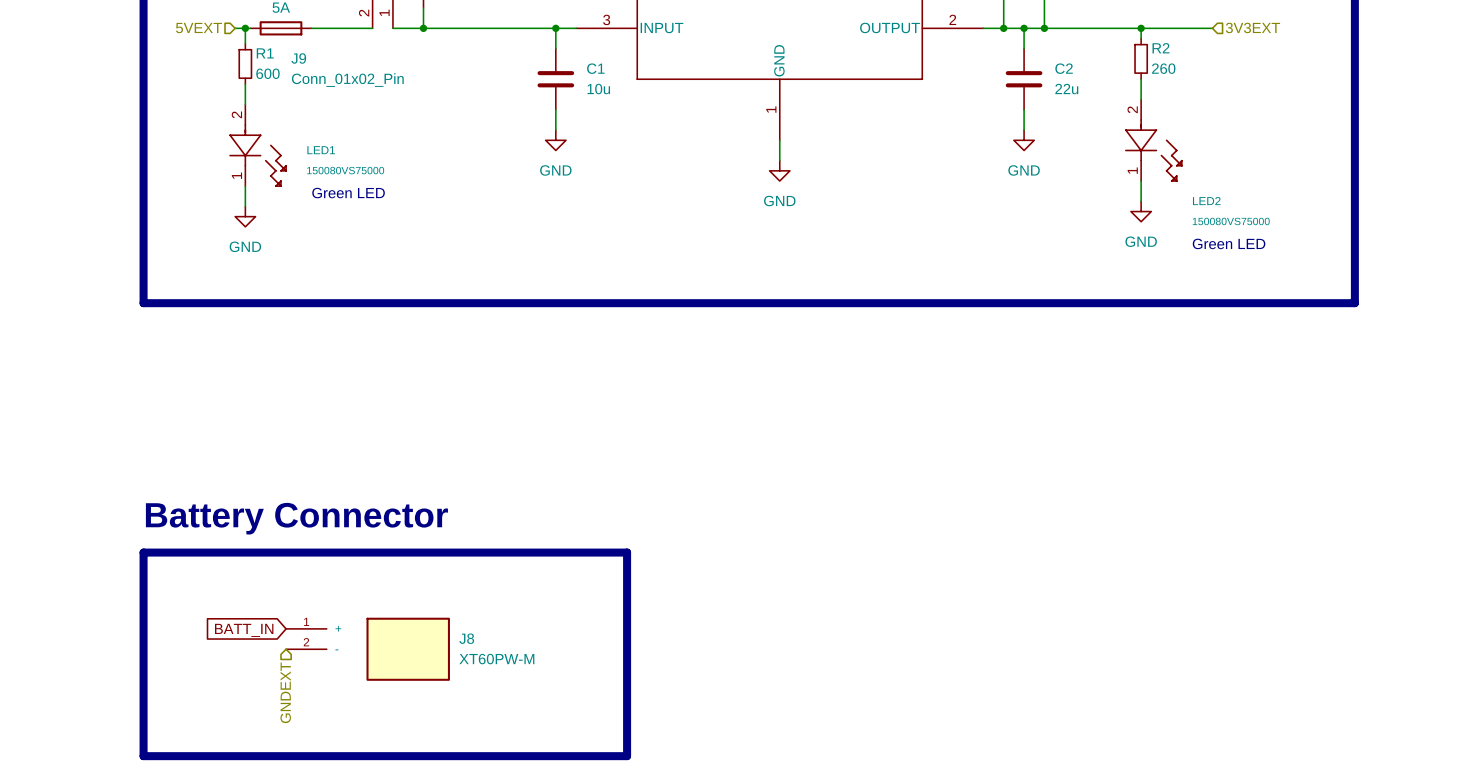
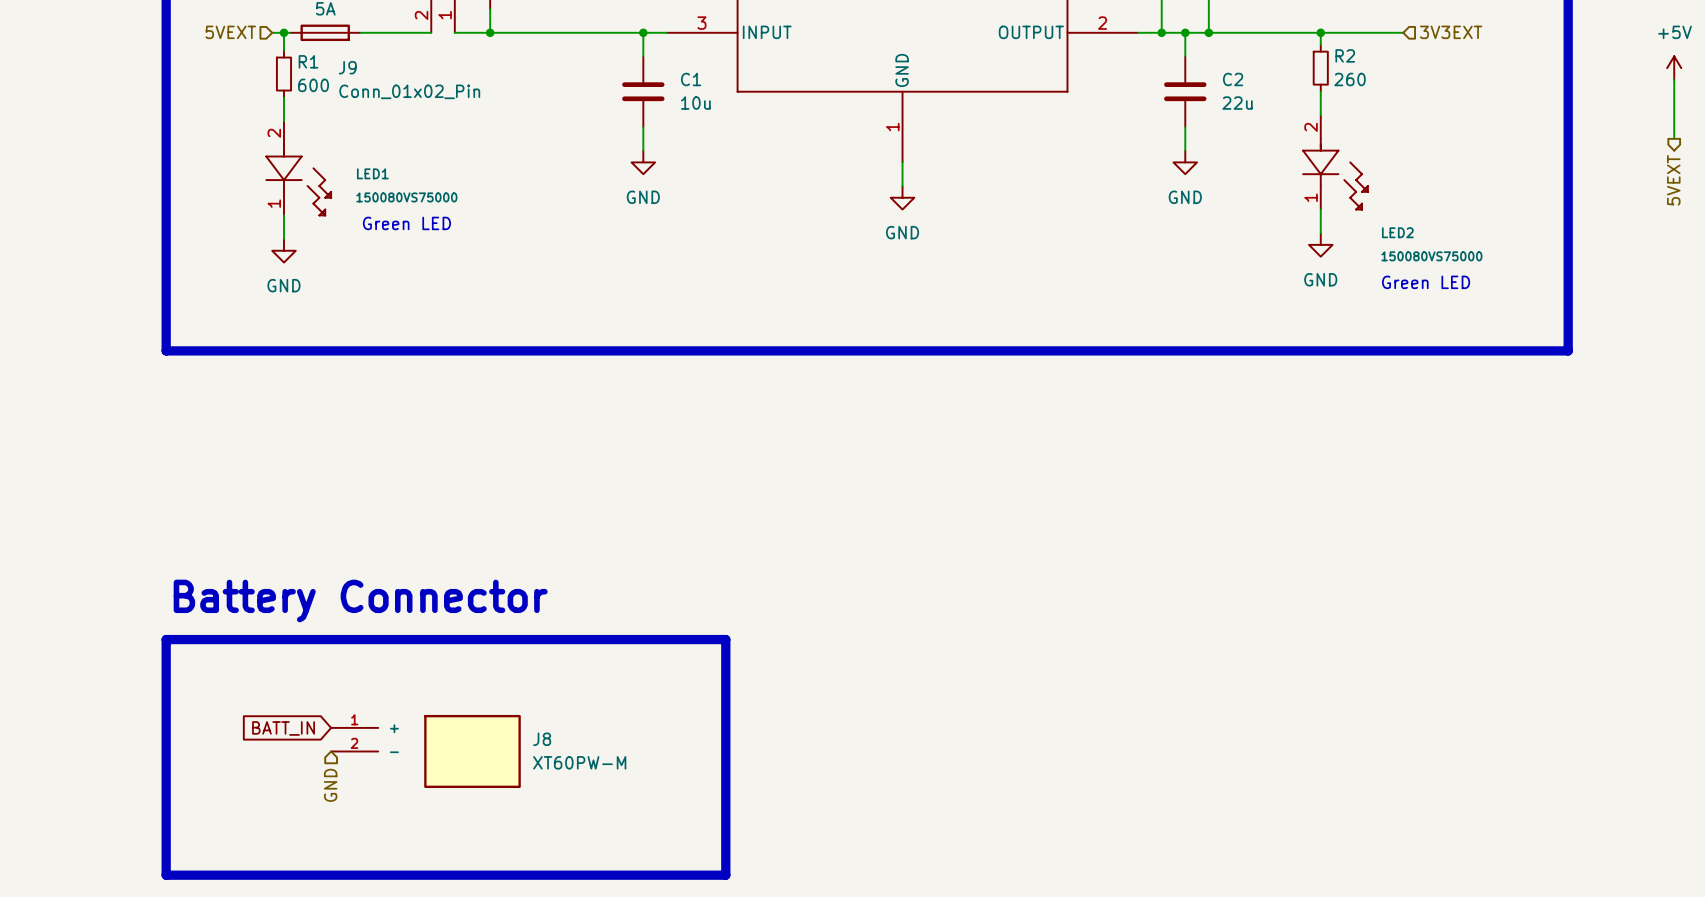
power symbol: none -> +5V (1674, 68)
wire: none -> (1674, 79) (1674, 138)
hierarchical label: none -> 5VEXT (1673, 180)
hierarchical label: GNDEXT (285, 692) -> GND (330, 785)

